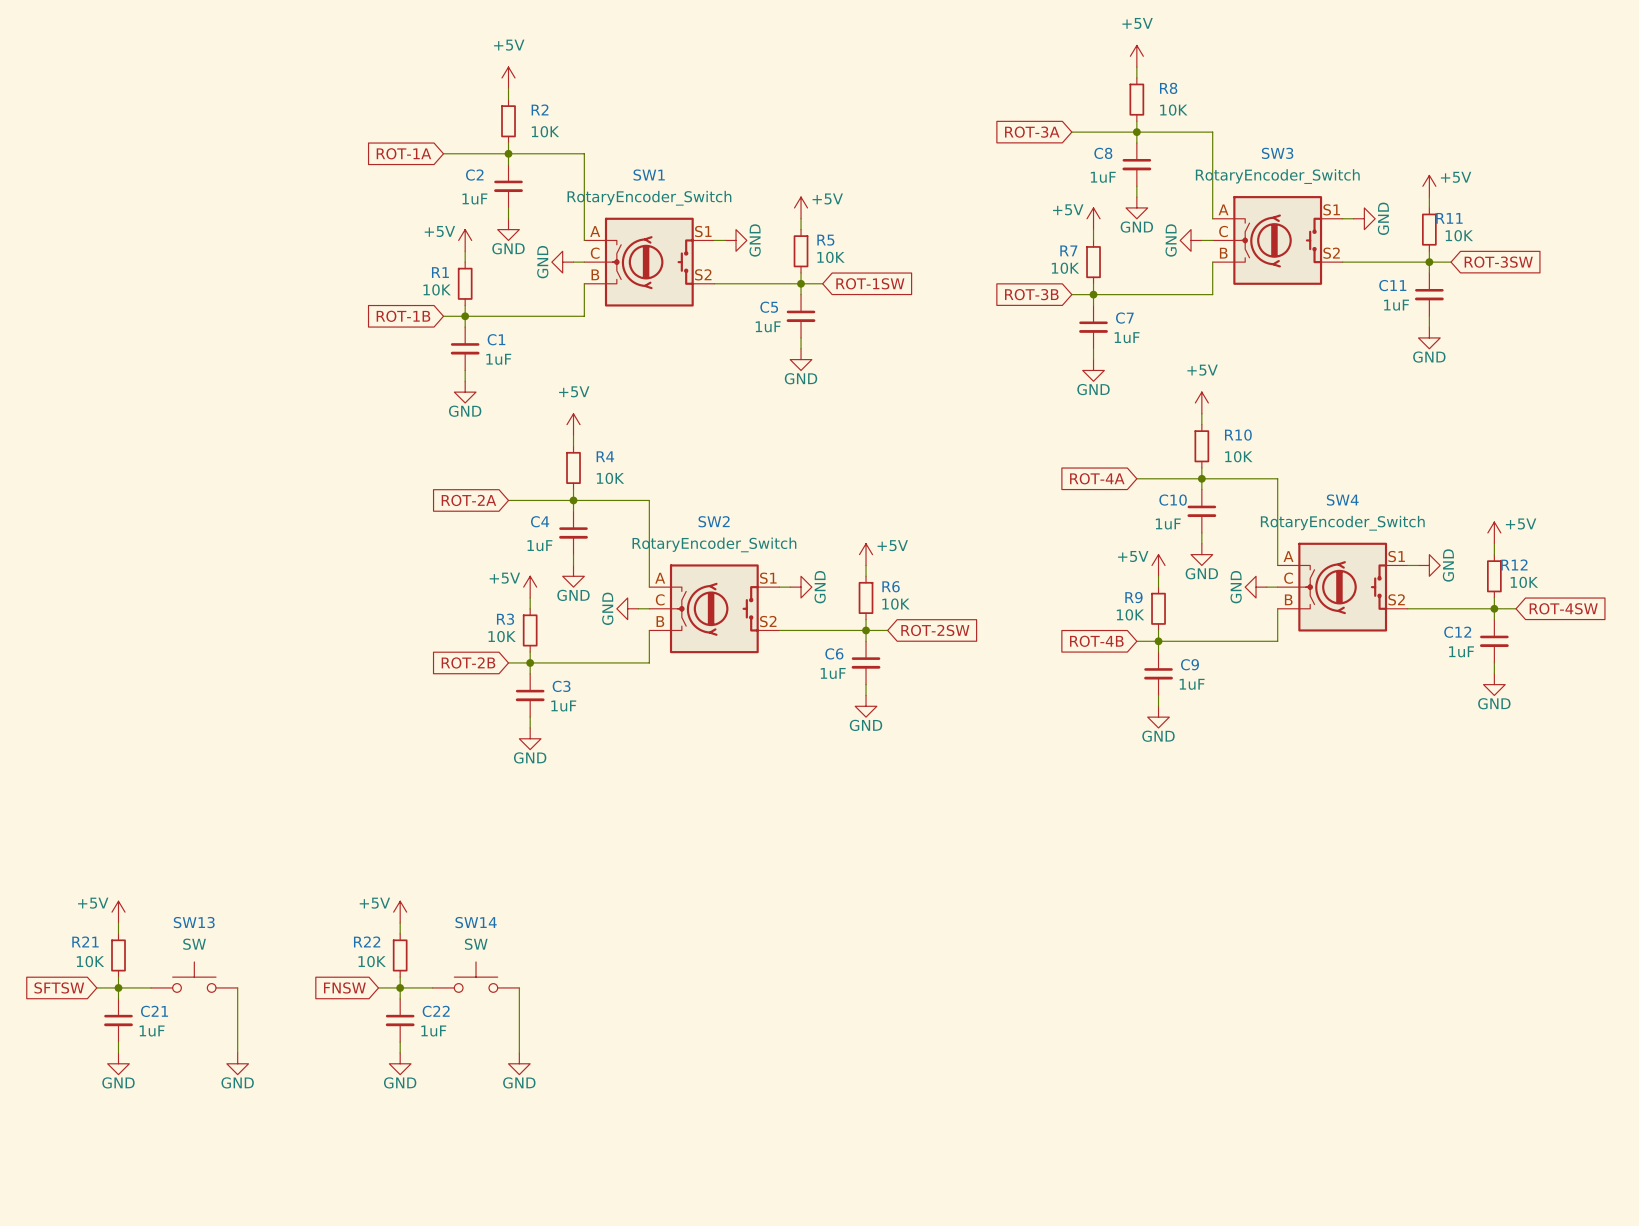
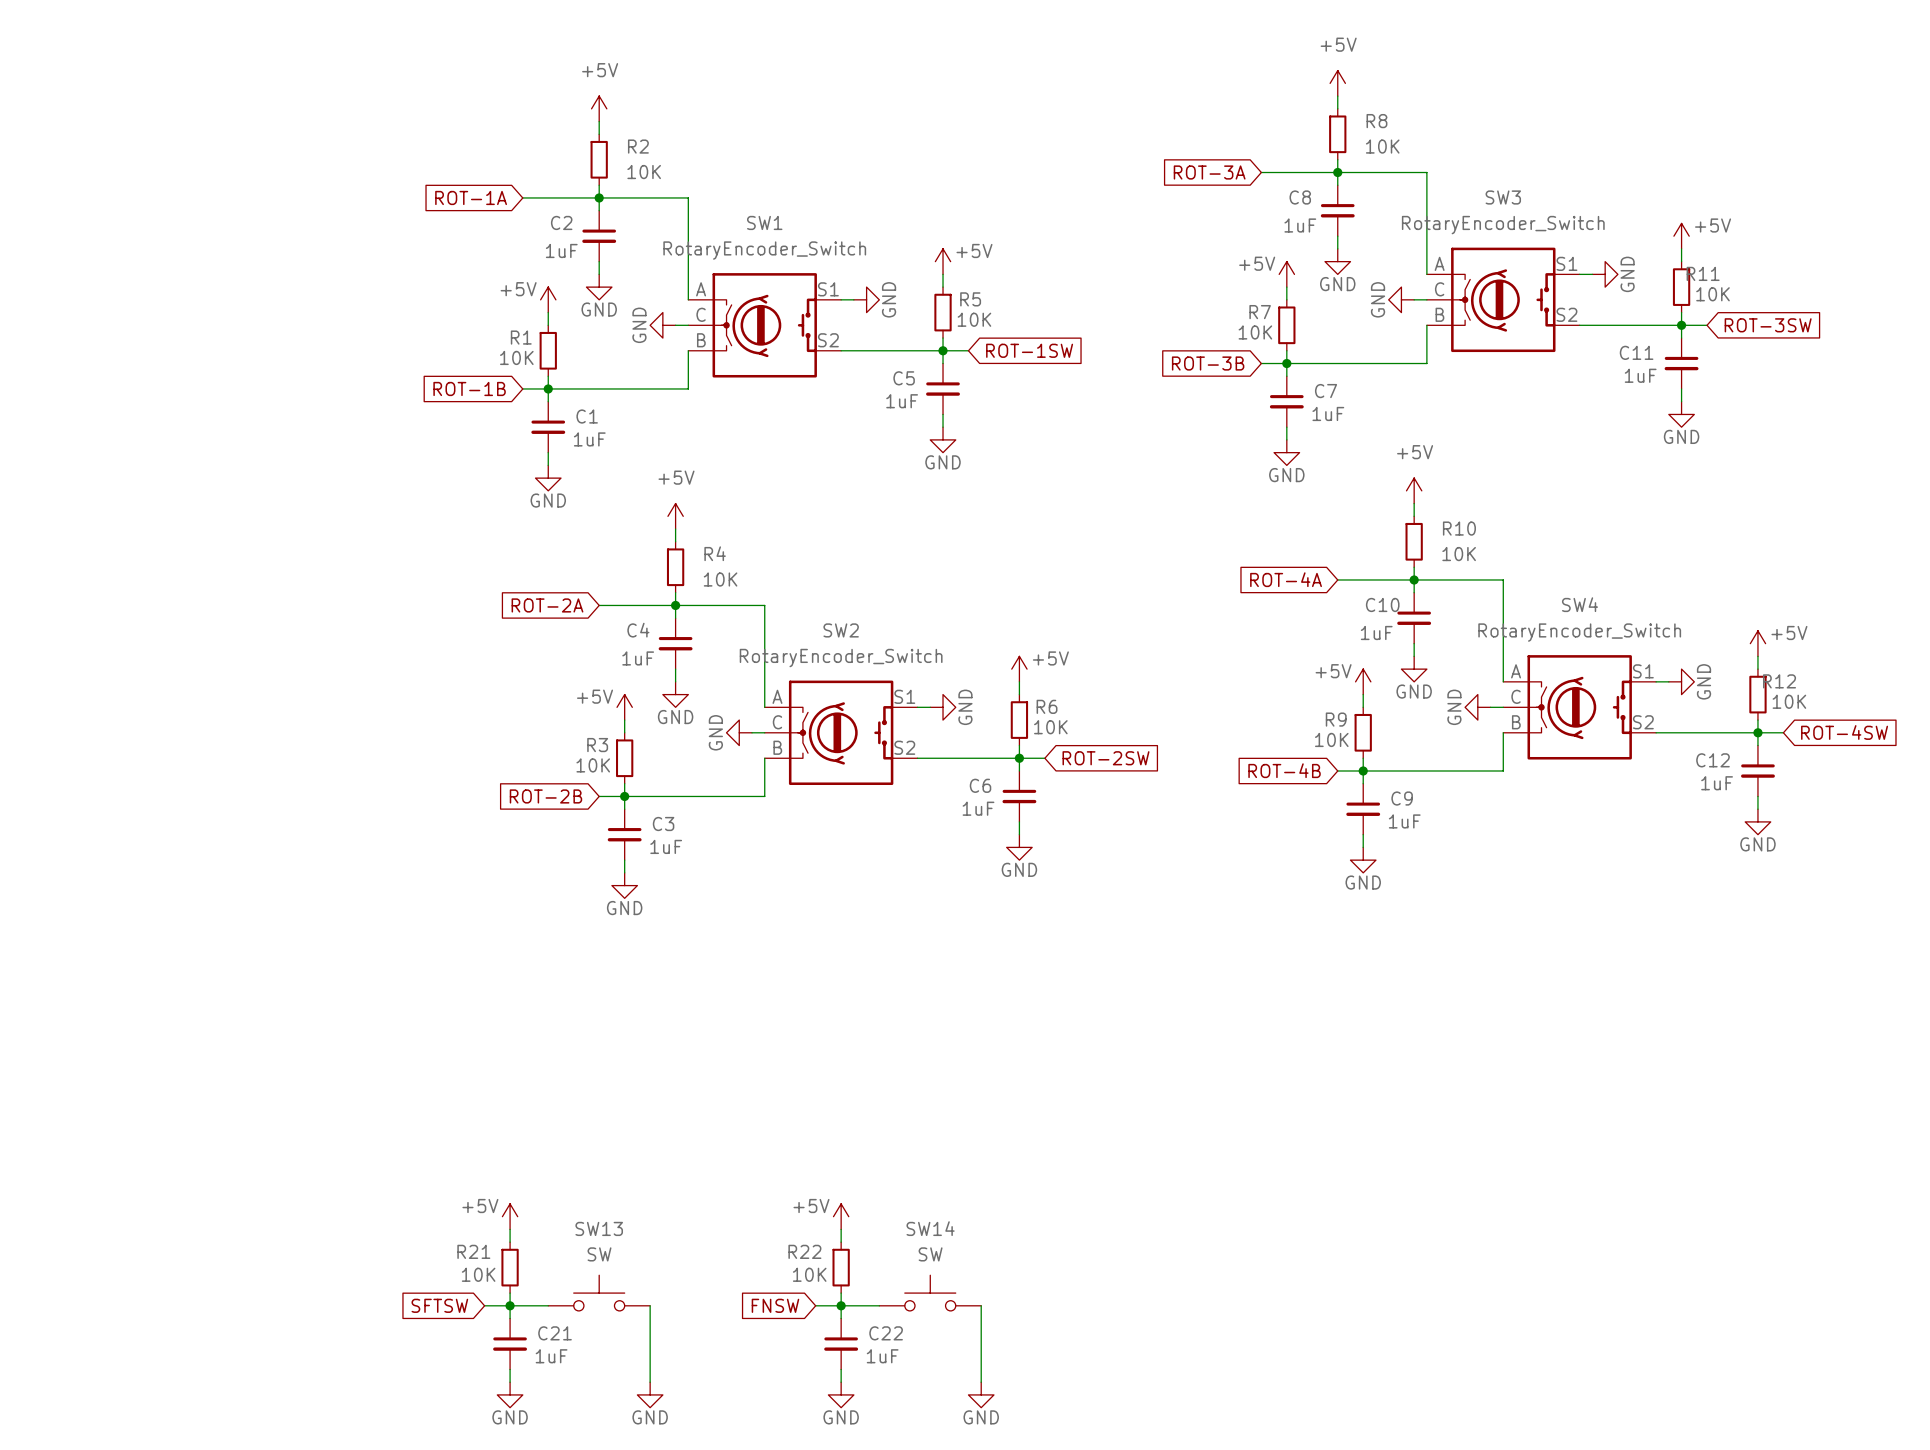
power symbol: +5V (118, 912) -> none
power symbol position: +5V (400, 912) -> +5V (510, 1216)
wire: (118, 922) (118, 933) -> none
wire: (400, 922) (400, 933) -> (510, 1229) (510, 1242)
R21 position: (118, 955) -> (510, 1267)
R22 position: (400, 955) -> (841, 1267)
wire: (118, 977) (118, 998) -> none
SW13 position: (194, 977) -> (599, 1293)
wire: (400, 977) (400, 998) -> (510, 1293) (510, 1318)
SW14 position: (476, 977) -> (930, 1293)
global label: SFTSW (59, 987) -> none
wire: (96, 987) (151, 987) -> none
junction: (118, 987) -> none
wire: (237, 987) (237, 1052) -> none
global label: FNSW (344, 987) -> none
wire: (378, 987) (432, 987) -> (484, 1305) (548, 1305)
junction: (400, 987) -> none
wire: (519, 987) (519, 1052) -> (650, 1305) (650, 1382)
C21 position: (118, 1020) -> (510, 1344)
C22 position: (400, 1020) -> (841, 1344)
power symbol: none -> +5V (841, 1216)
wire: none -> (841, 1229) (841, 1242)
wire: (118, 1042) (118, 1052) -> none
wire: (400, 1042) (400, 1052) -> (510, 1369) (510, 1382)
power symbol: GND (118, 1063) -> none
power symbol: GND (237, 1063) -> none
power symbol: GND (400, 1063) -> none
power symbol: GND (519, 1063) -> none
wire: none -> (841, 1293) (841, 1318)
global label: none -> SFTSW (439, 1305)
junction: none -> (510, 1305)
global label: none -> FNSW (775, 1305)
wire: none -> (815, 1305) (879, 1305)
junction: none -> (841, 1305)
wire: none -> (981, 1305) (981, 1382)
wire: none -> (841, 1369) (841, 1382)
power symbol: none -> GND (510, 1394)
power symbol: none -> GND (650, 1394)
power symbol: none -> GND (841, 1394)
power symbol: none -> GND (981, 1394)

